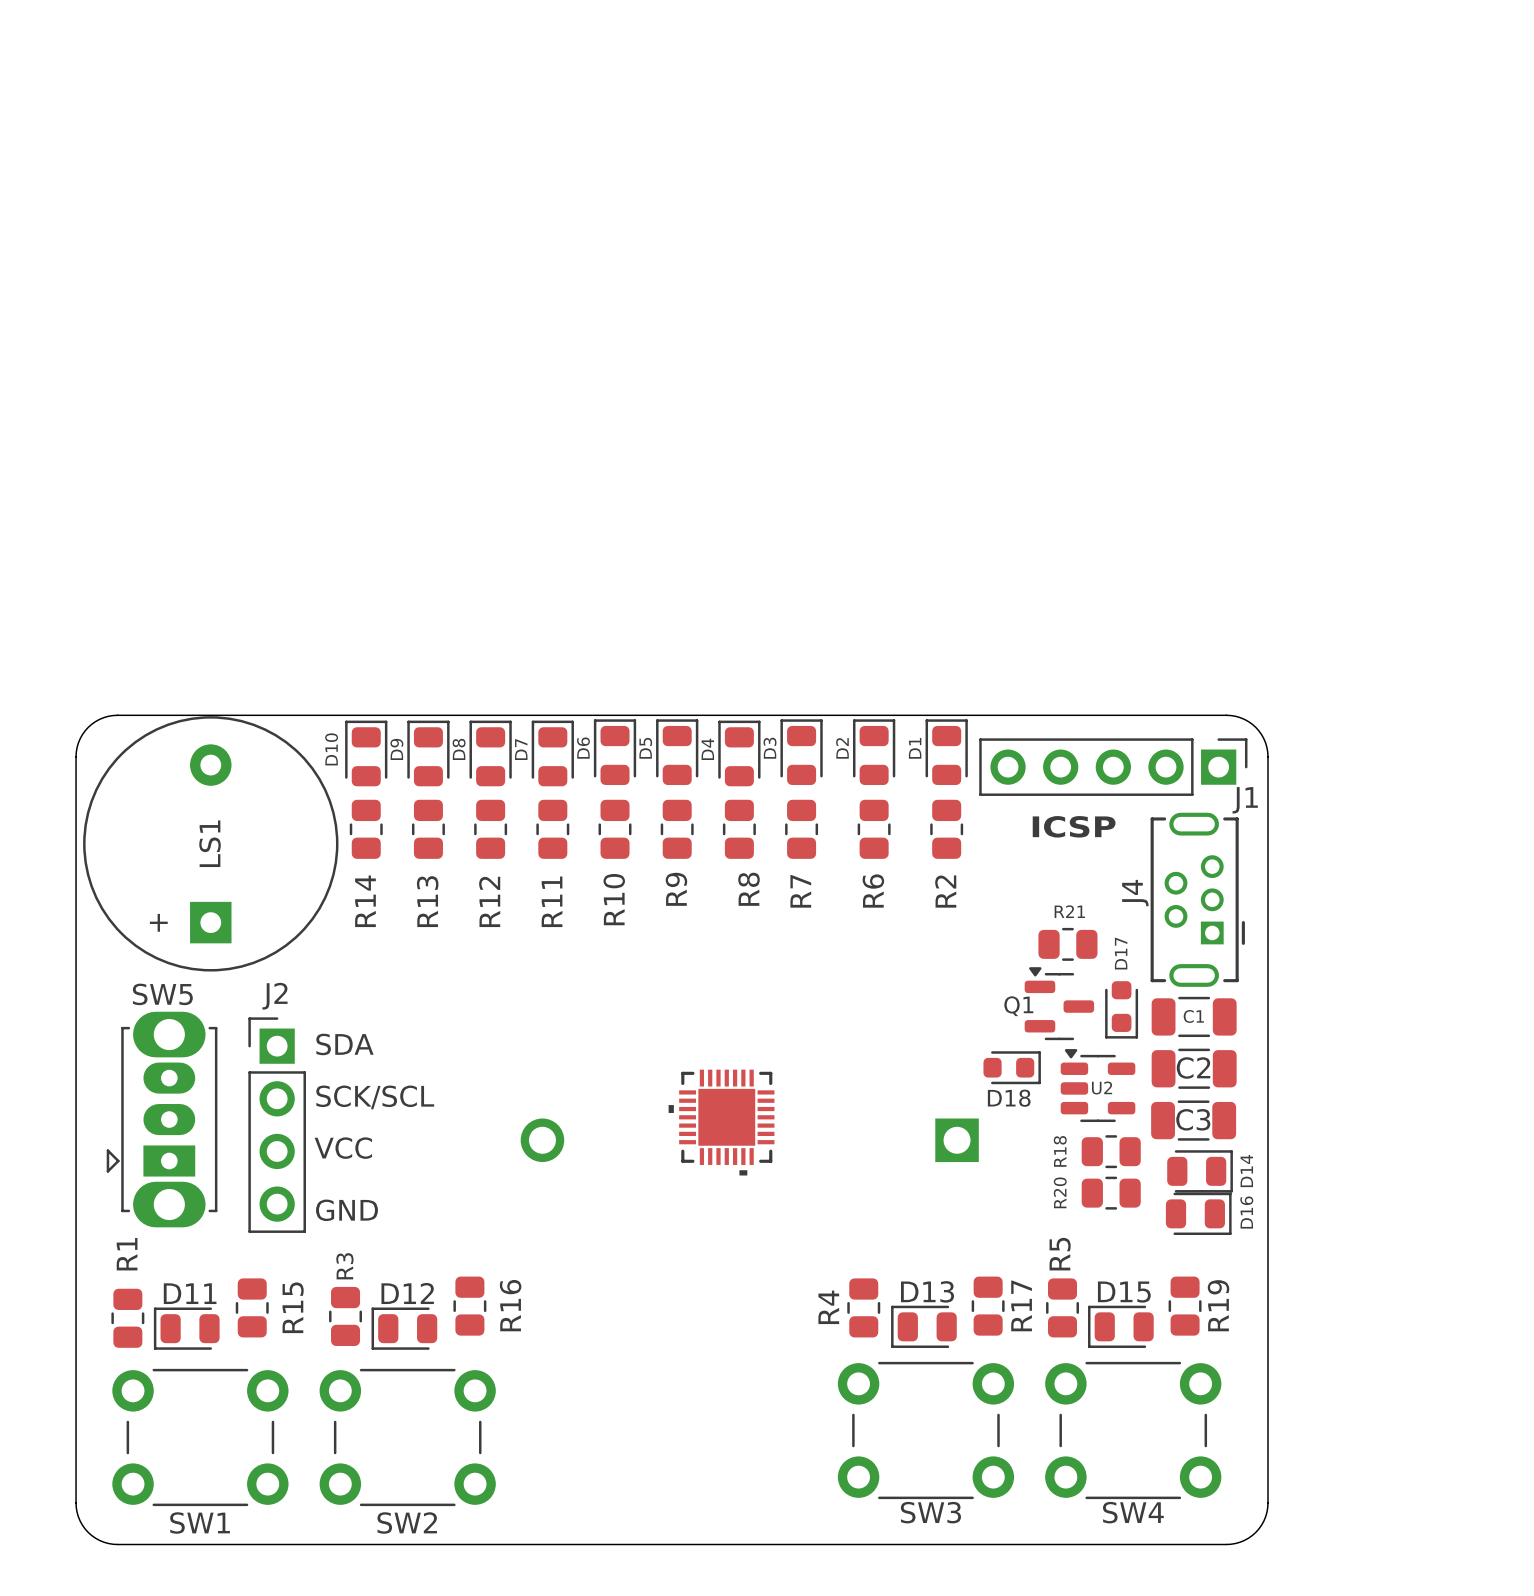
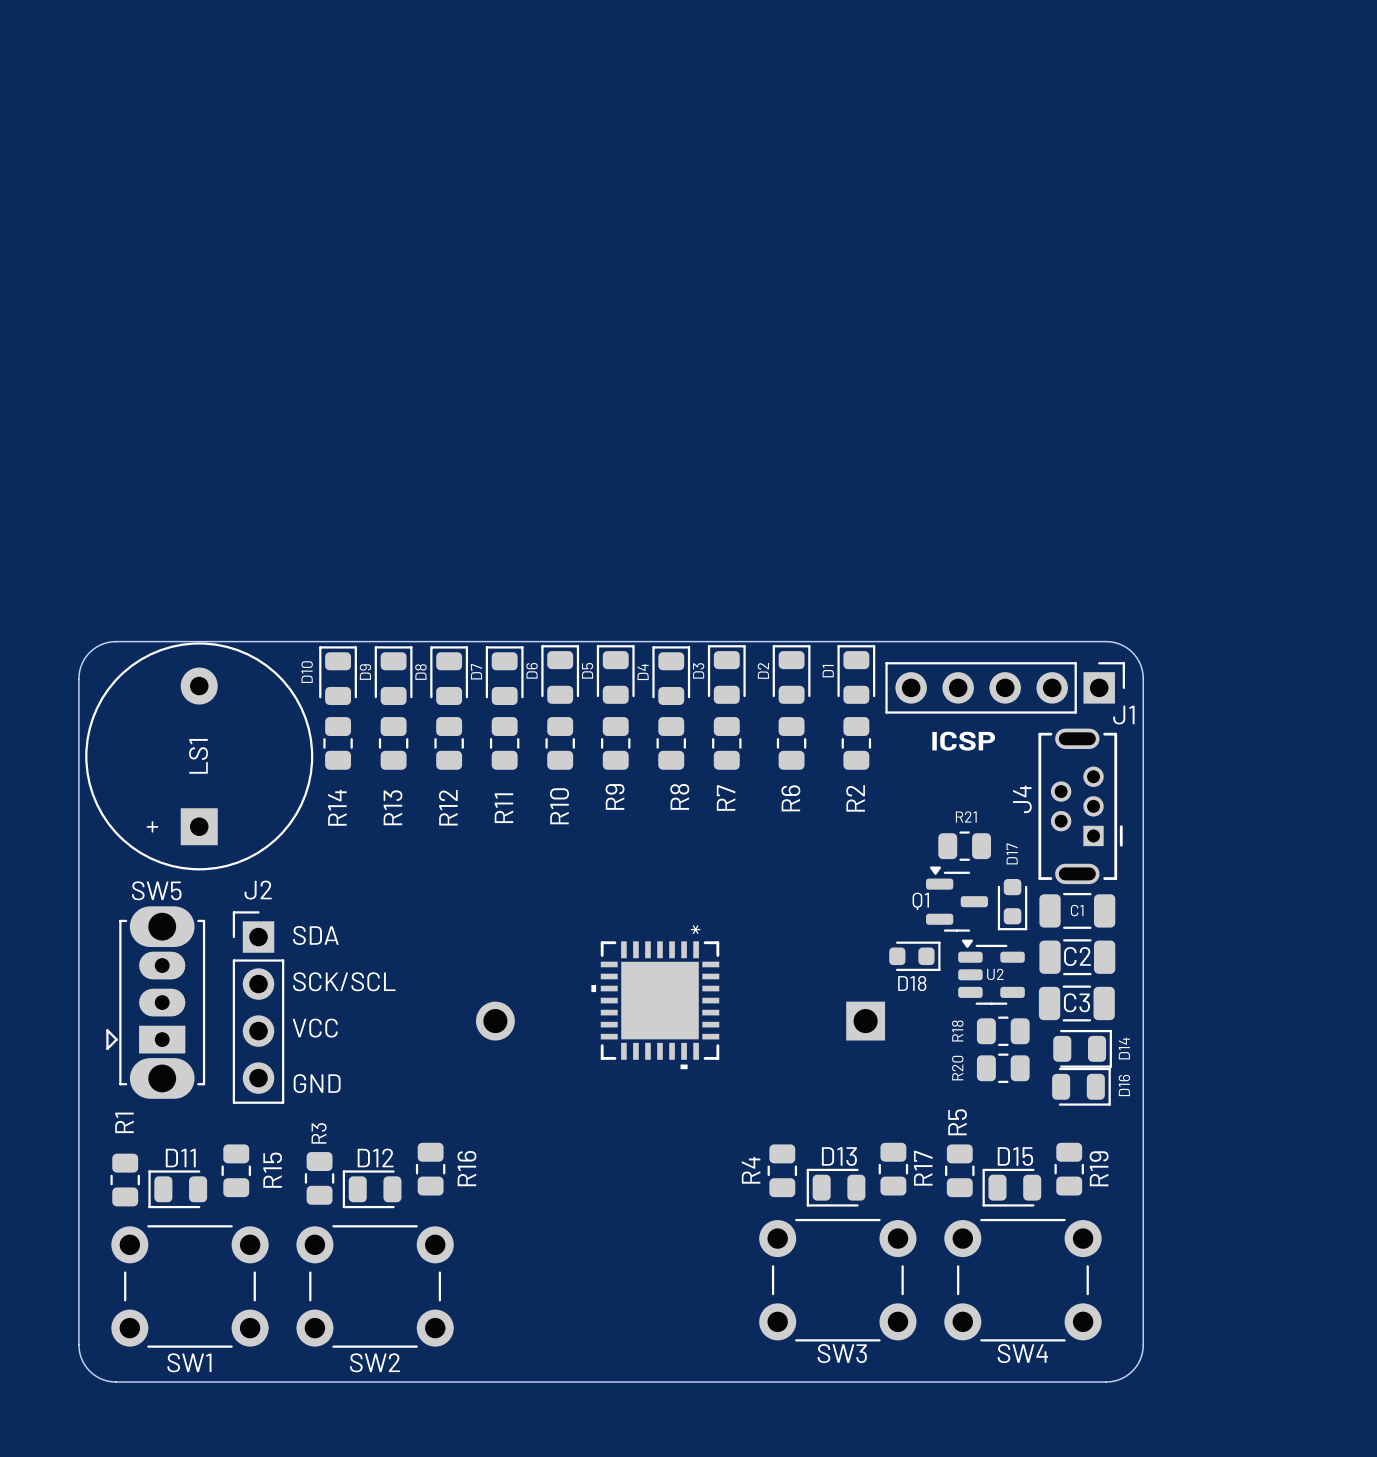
part footprint: [668, 1069, 775, 1176] -> [591, 941, 720, 1070]

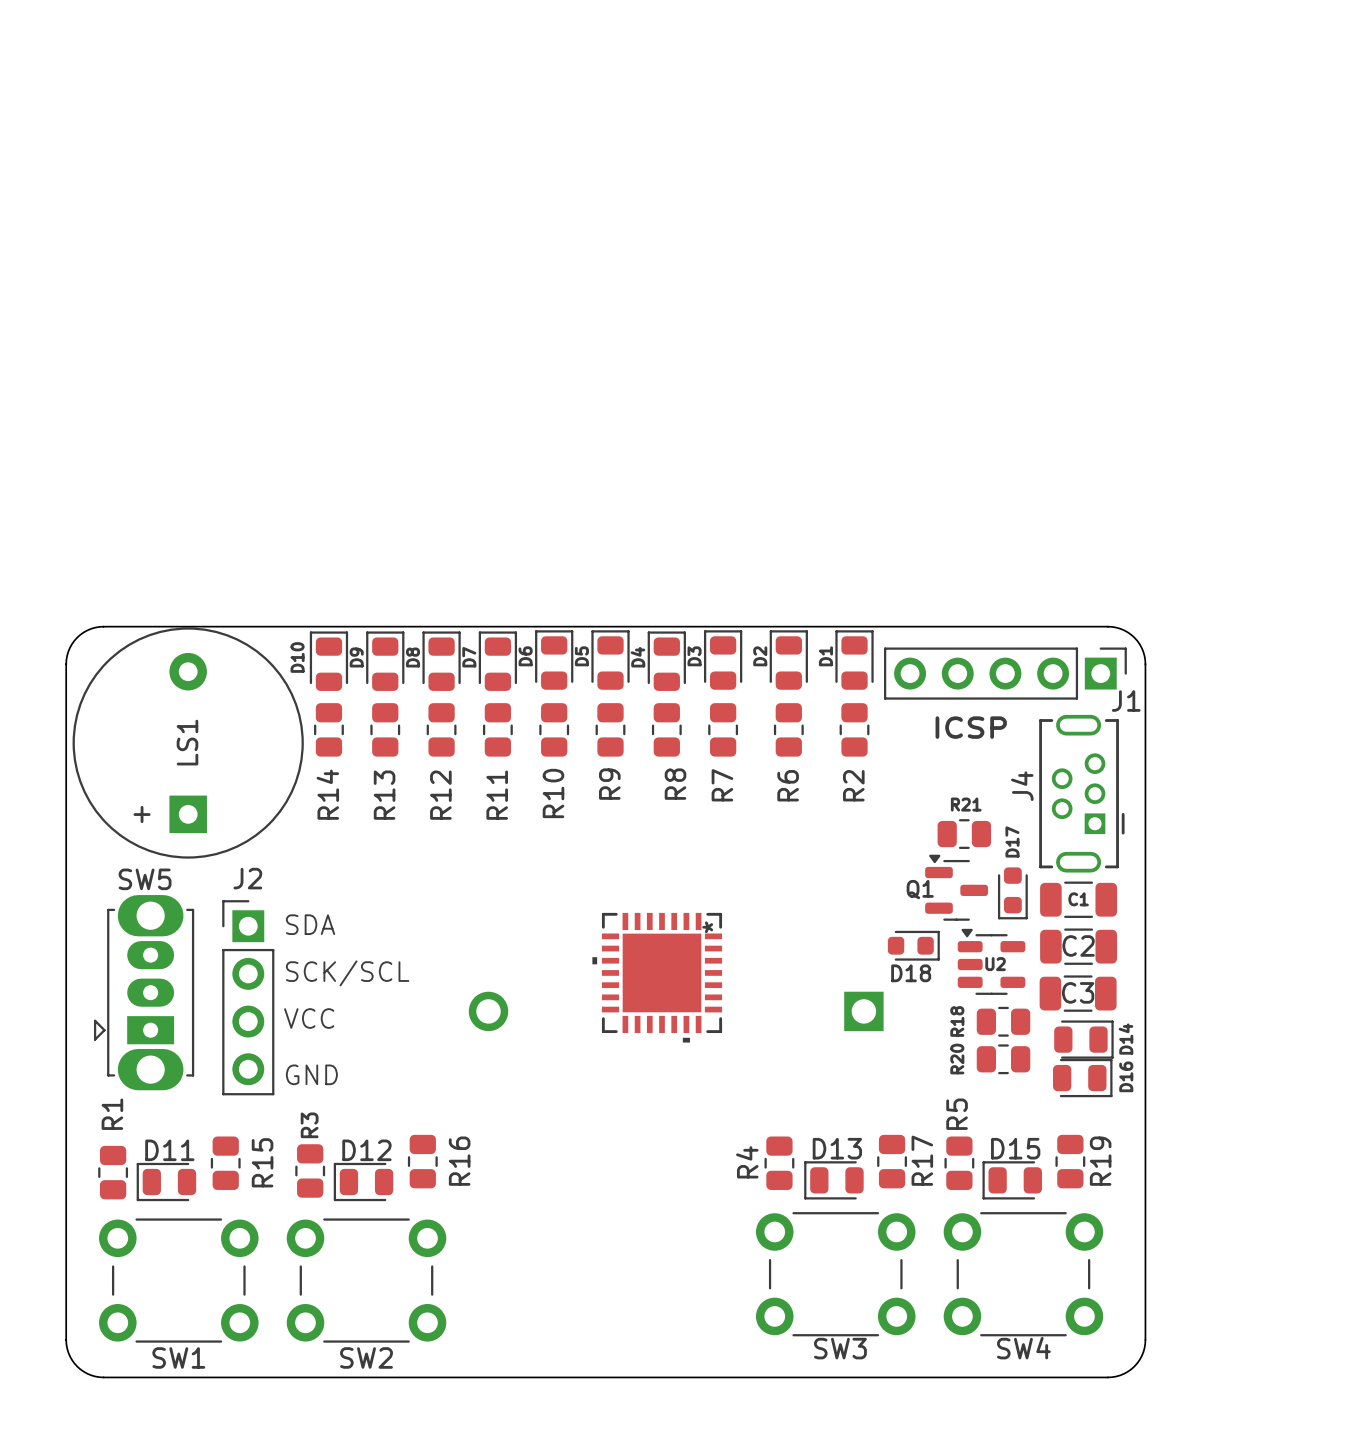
part: none -> (657, 977)
part: (655, 1005) -> none

